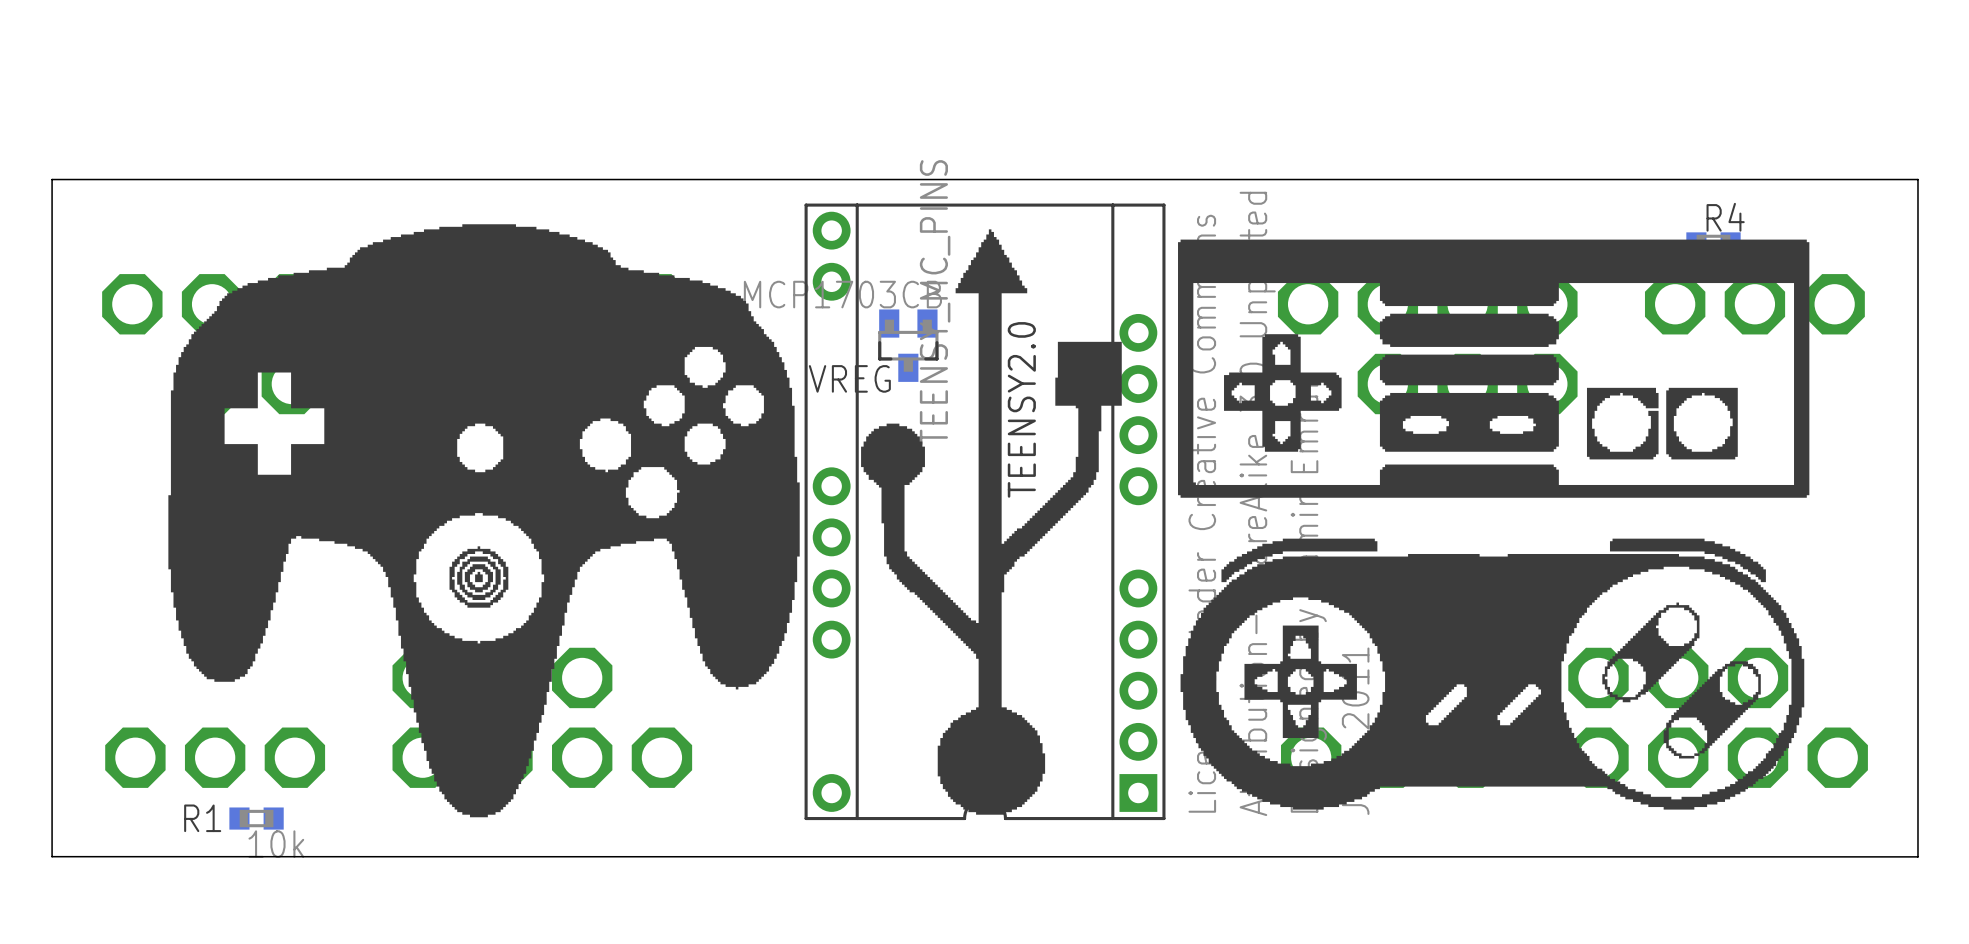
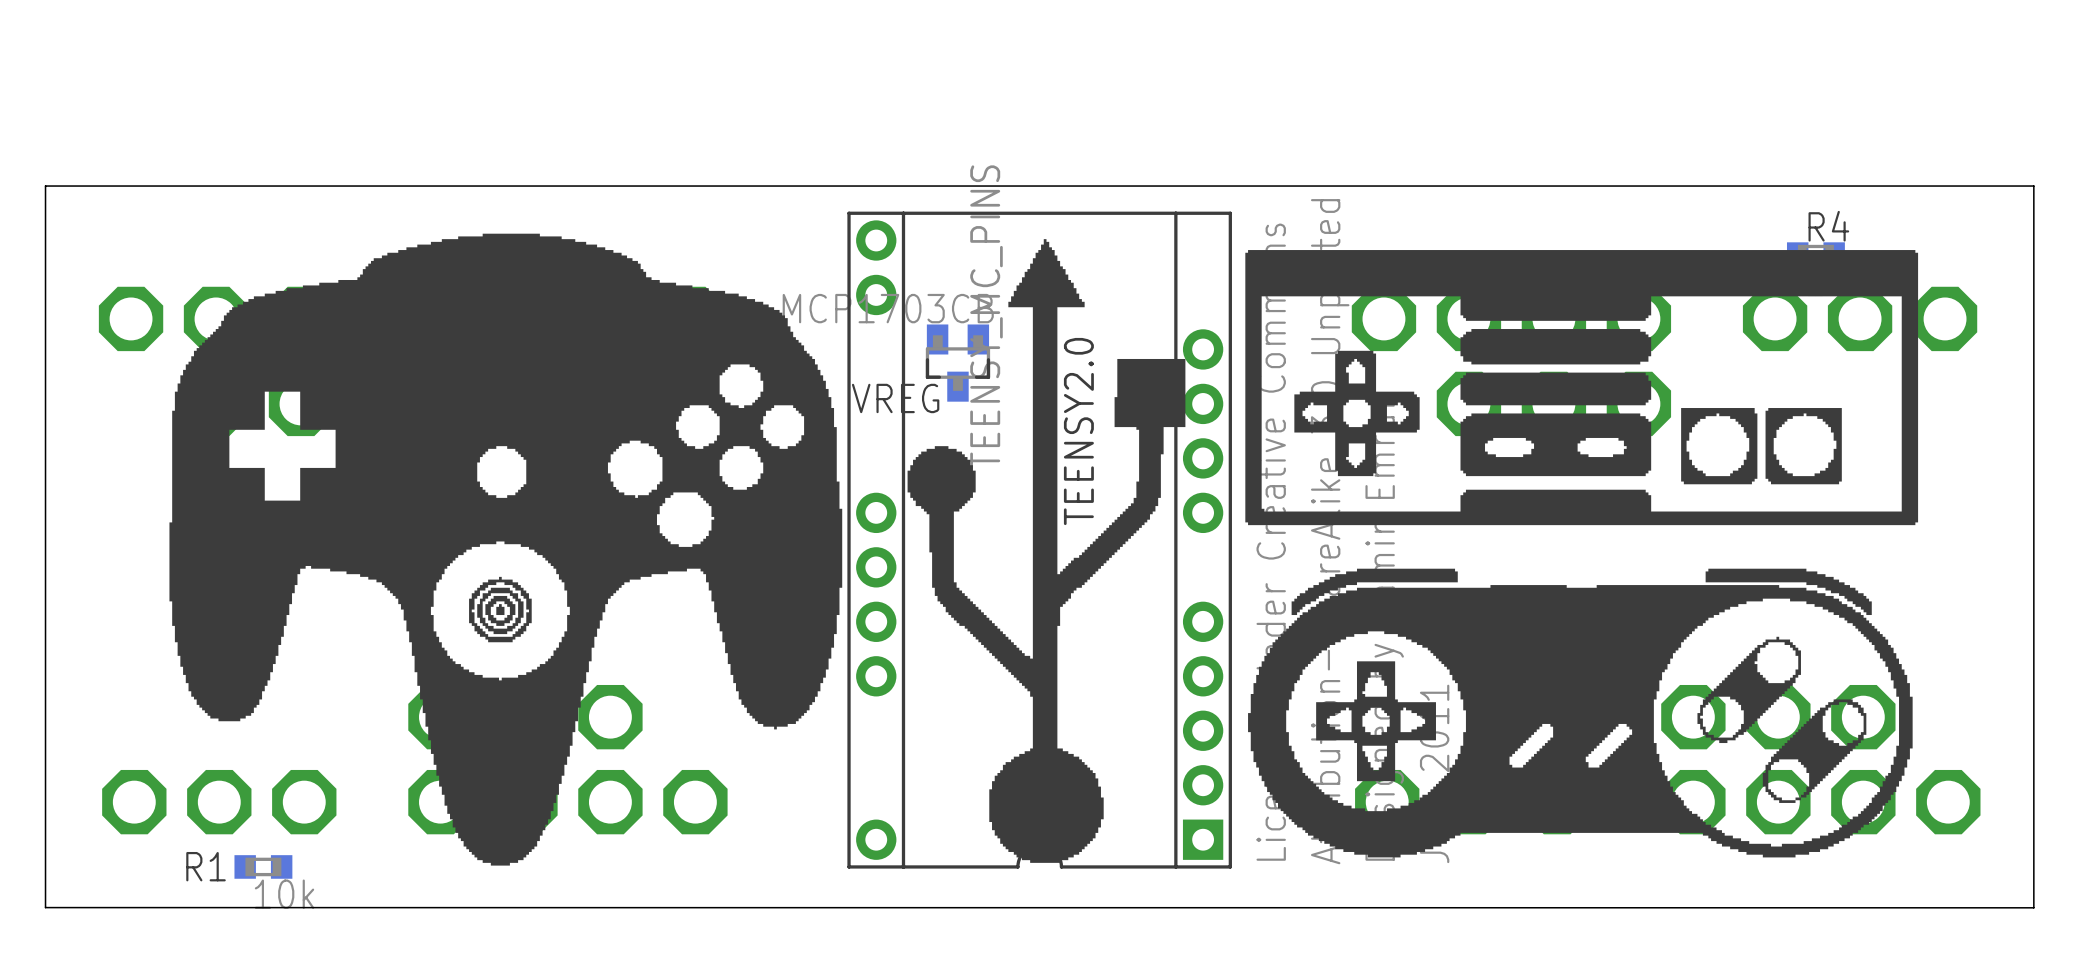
drawing: none -> [1743, 429, 1758, 433]

